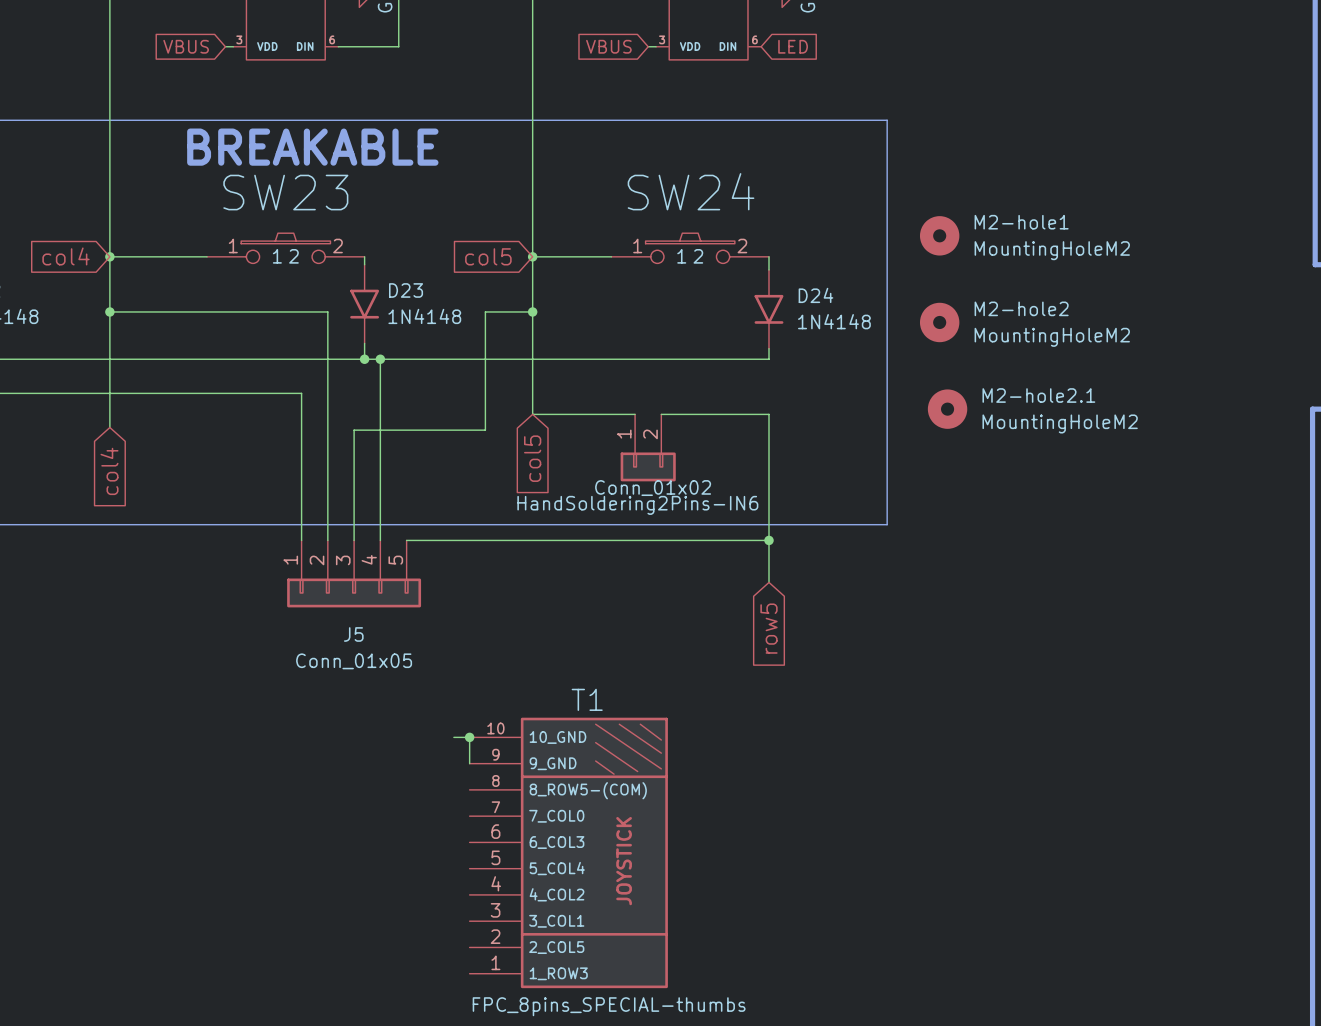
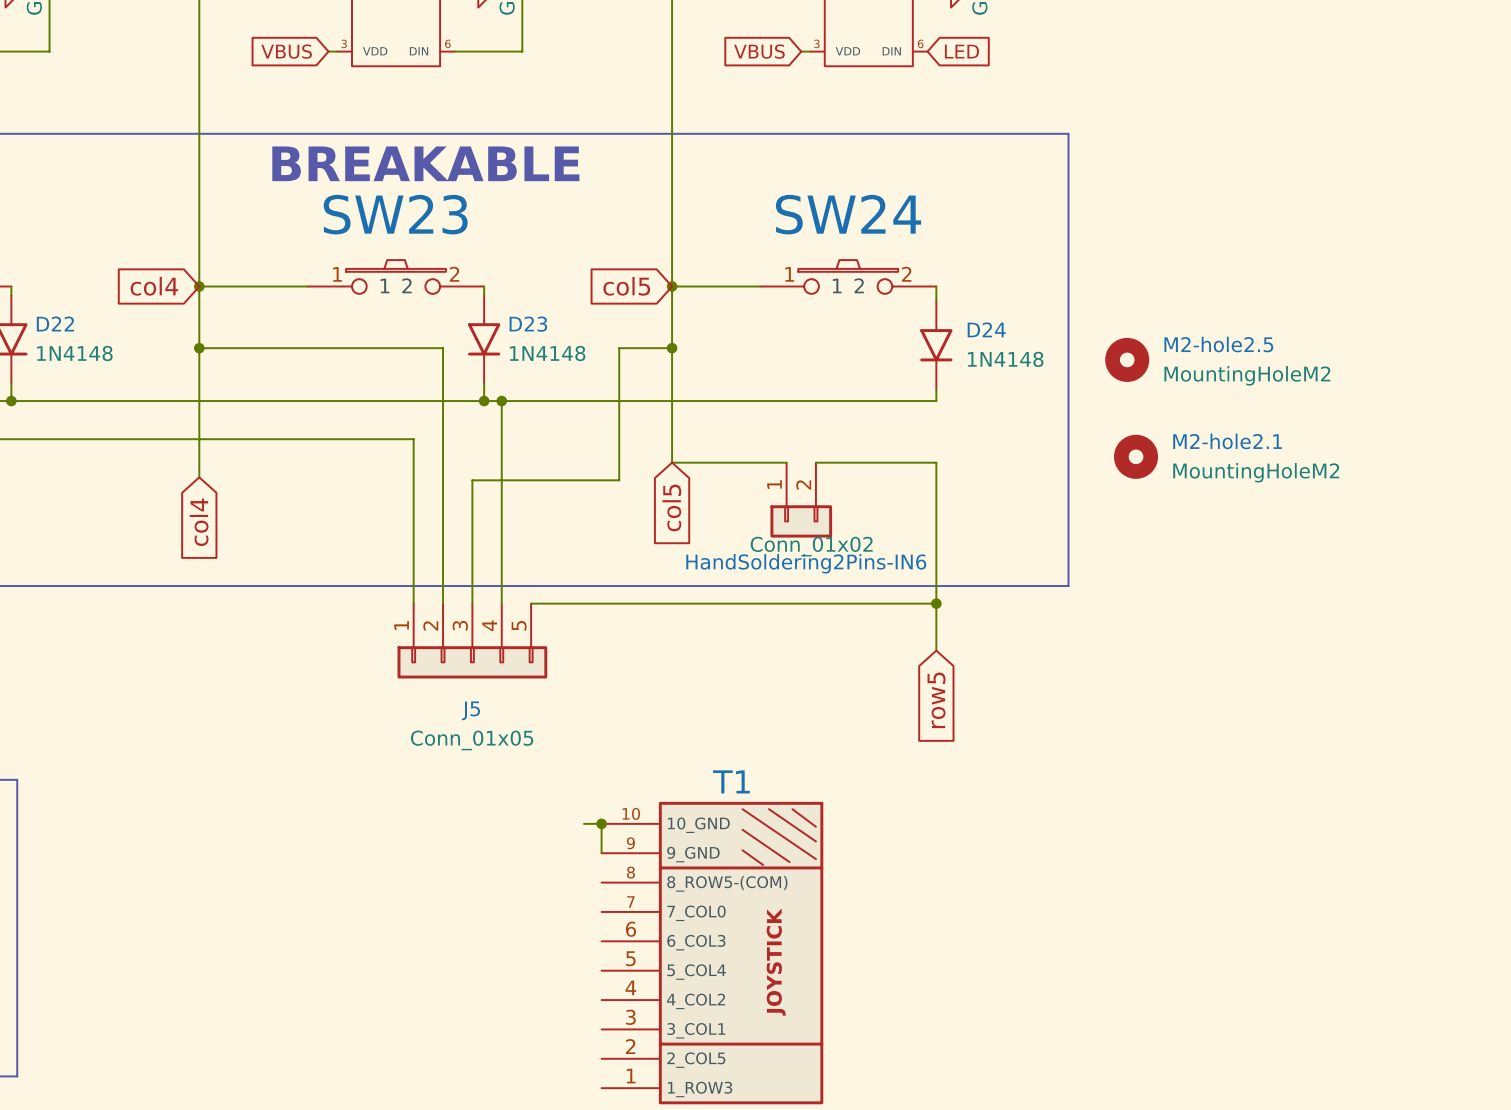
M2-hole1: MountingHoleM2 (939, 235) -> none
M2-hole2 name: M2-hole2 (1021, 308) -> M2-hole2.5 (1218, 344)

